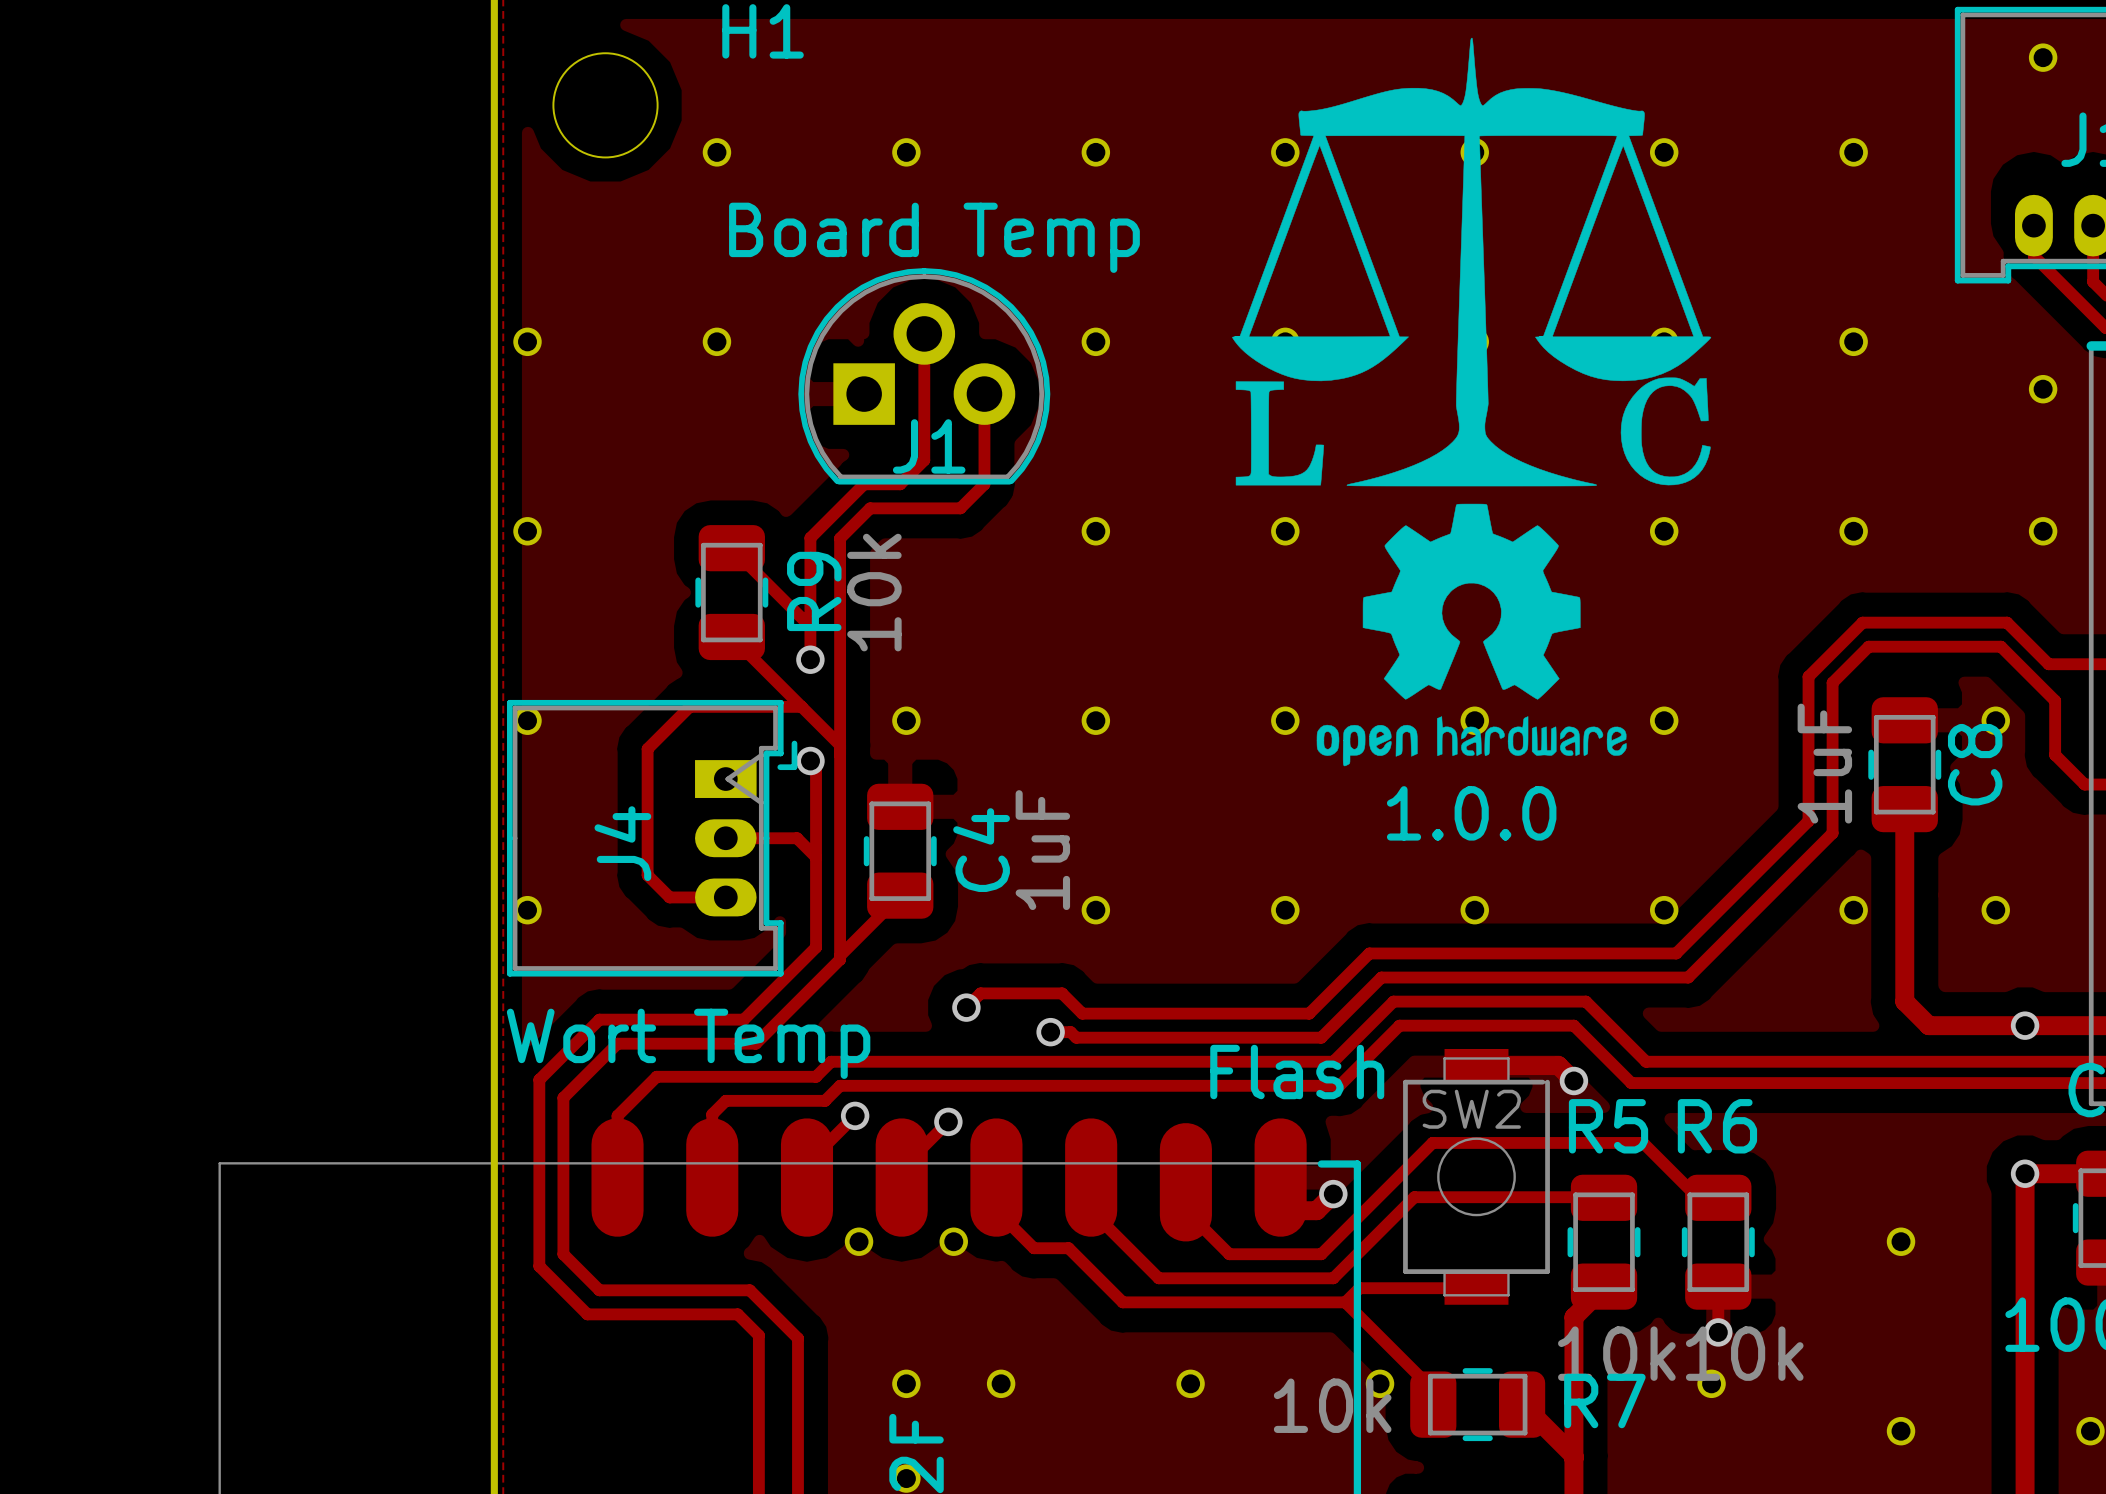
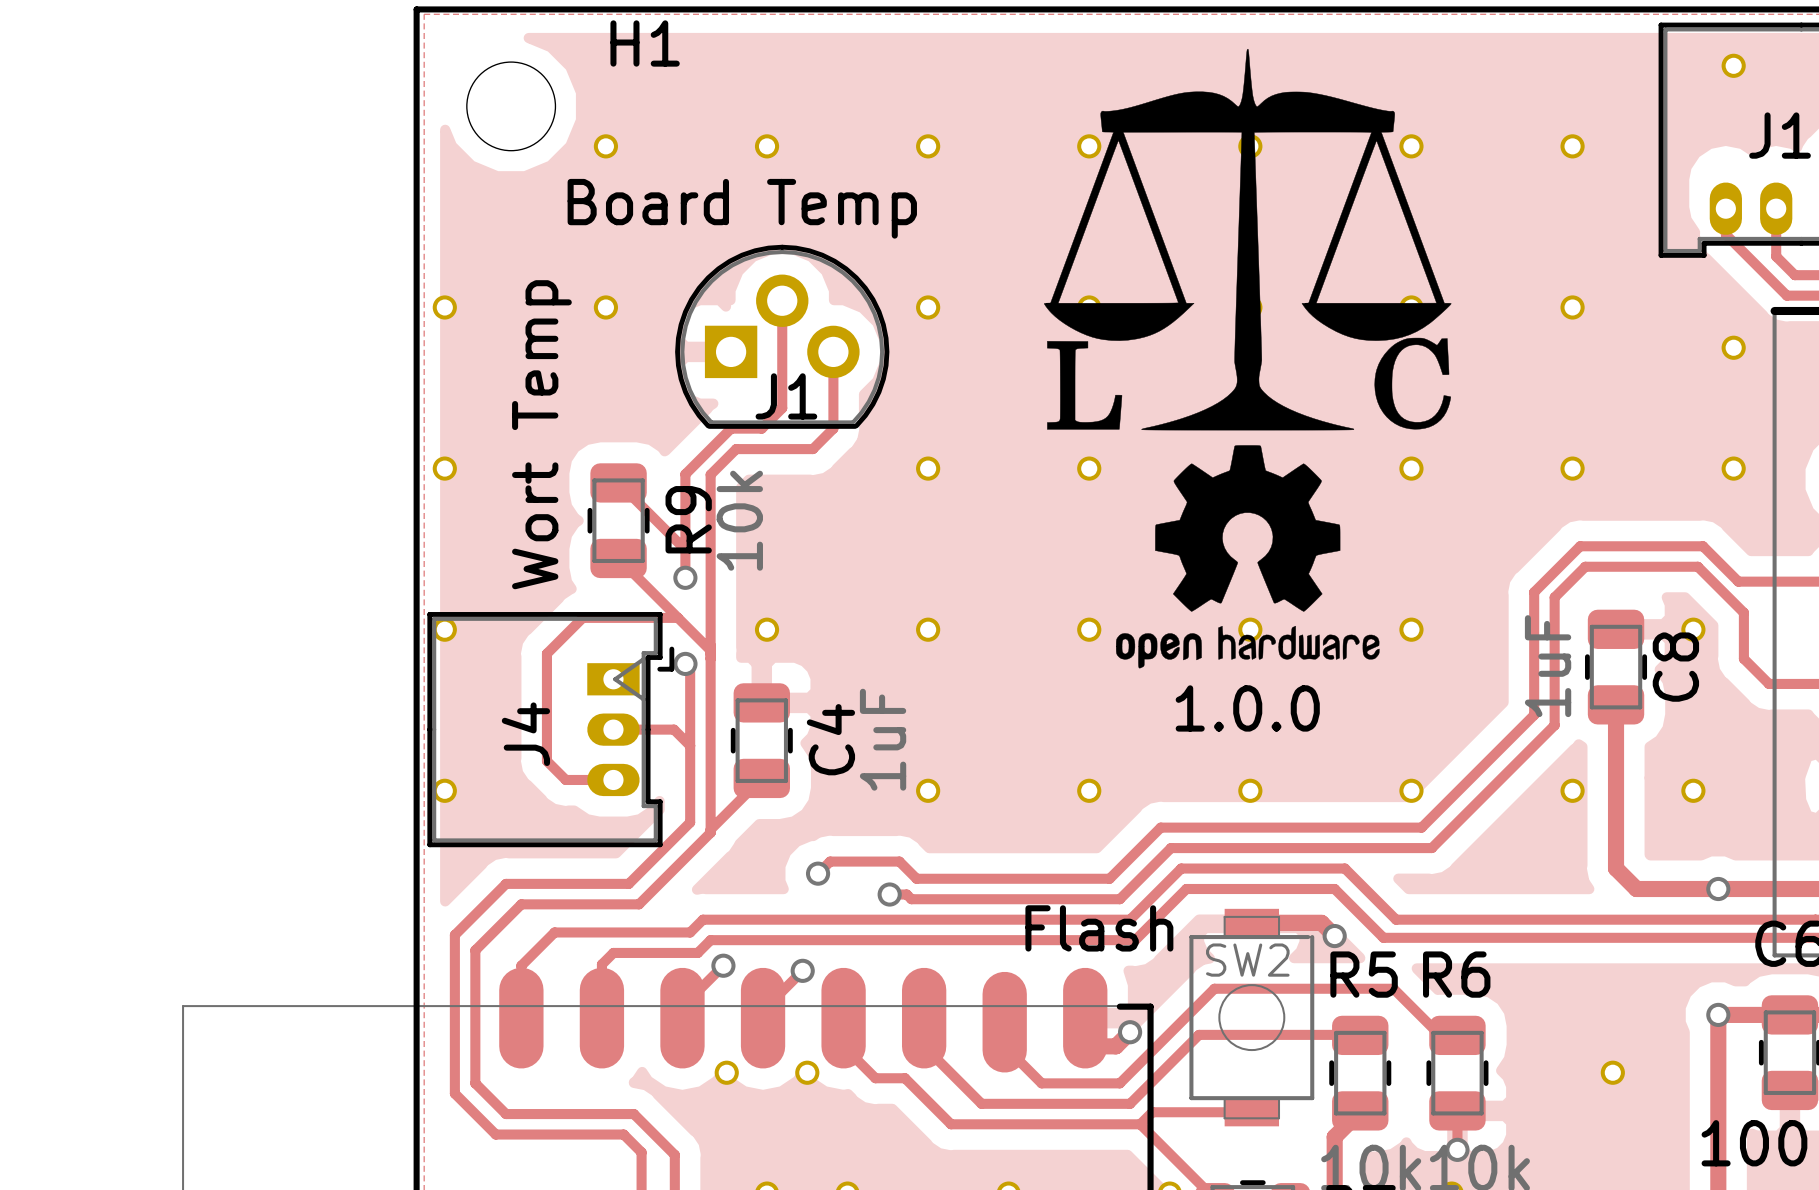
J1 value position: Board Temp (934, 237) -> Board Temp (742, 208)
J4 value rotation: 0° (688, 1043) -> 90° counterclockwise (541, 434)
J4 value position: Wort Temp (688, 1043) -> Wort Temp (541, 434)

